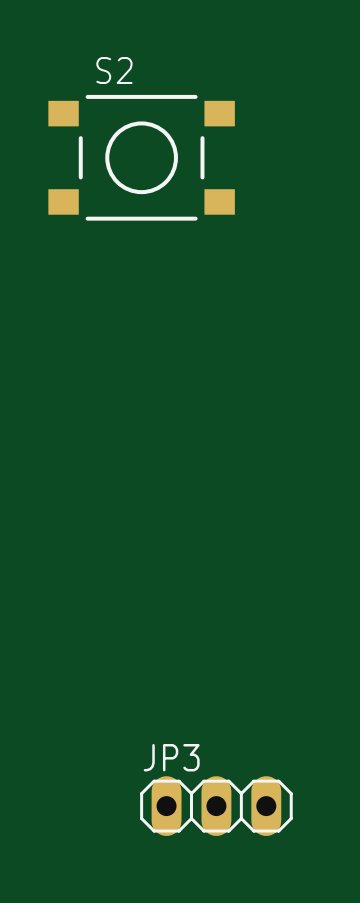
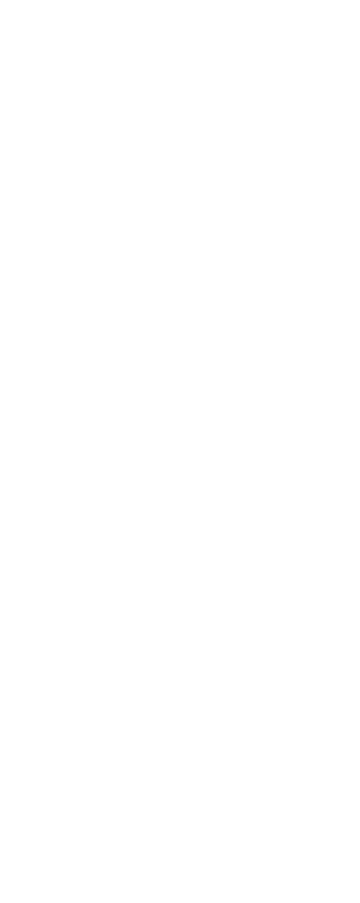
S2: (141, 157) -> none
JP3: (216, 806) -> none

